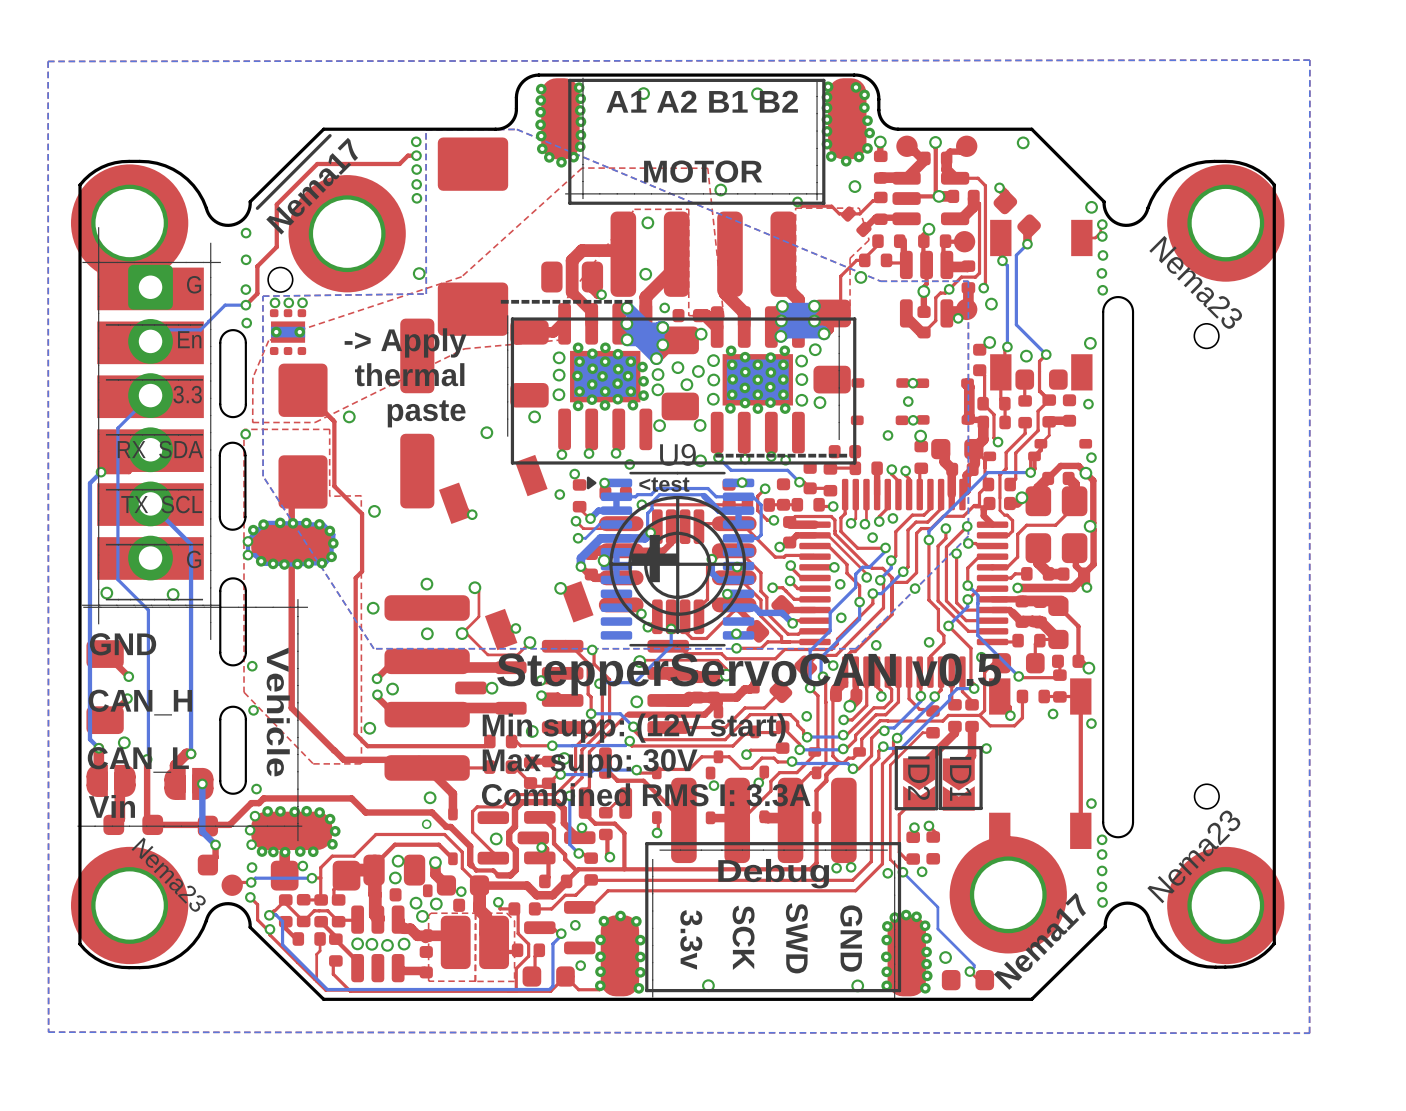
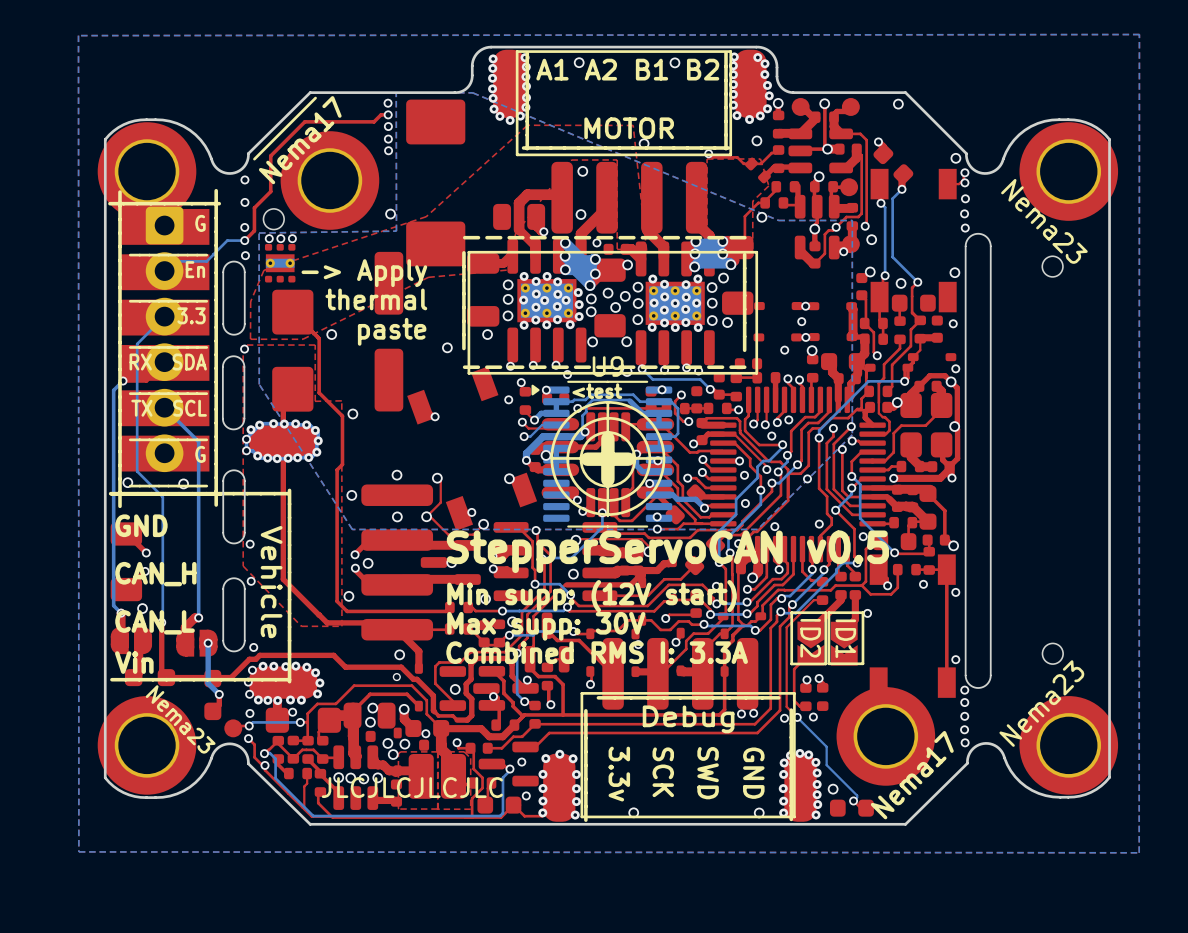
text: none -> JLCJLCJLCJLC (412, 787)

